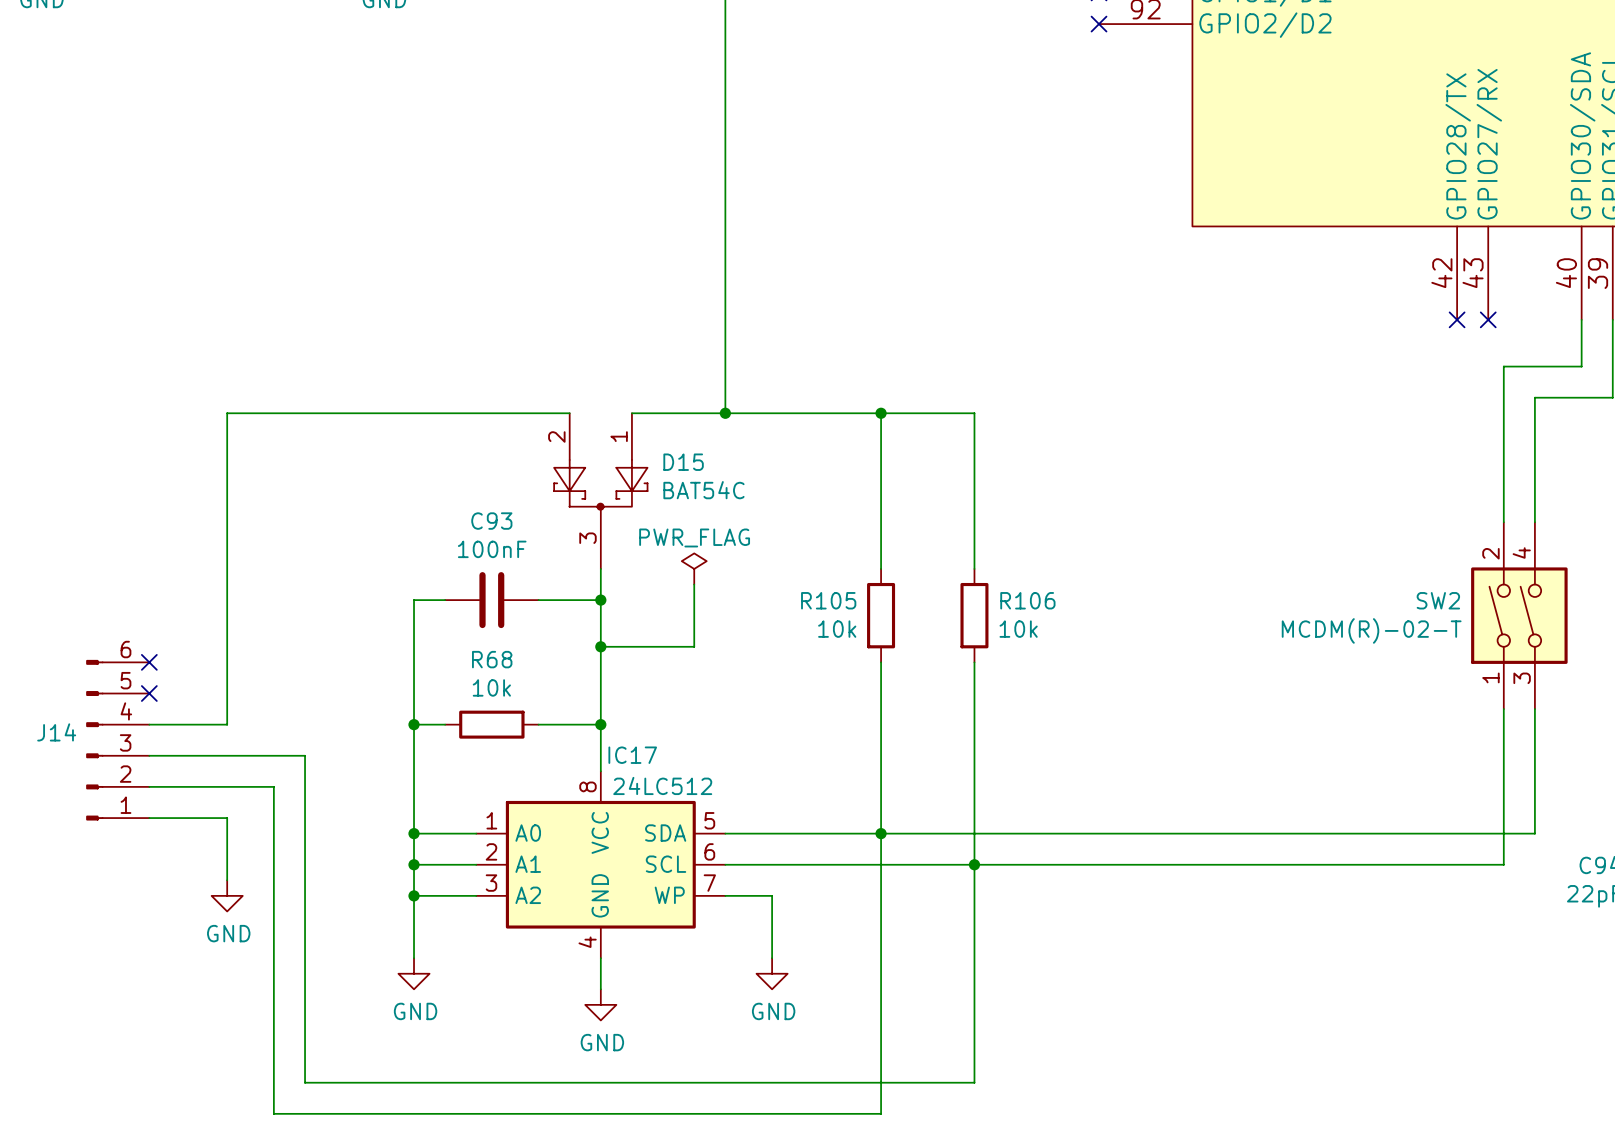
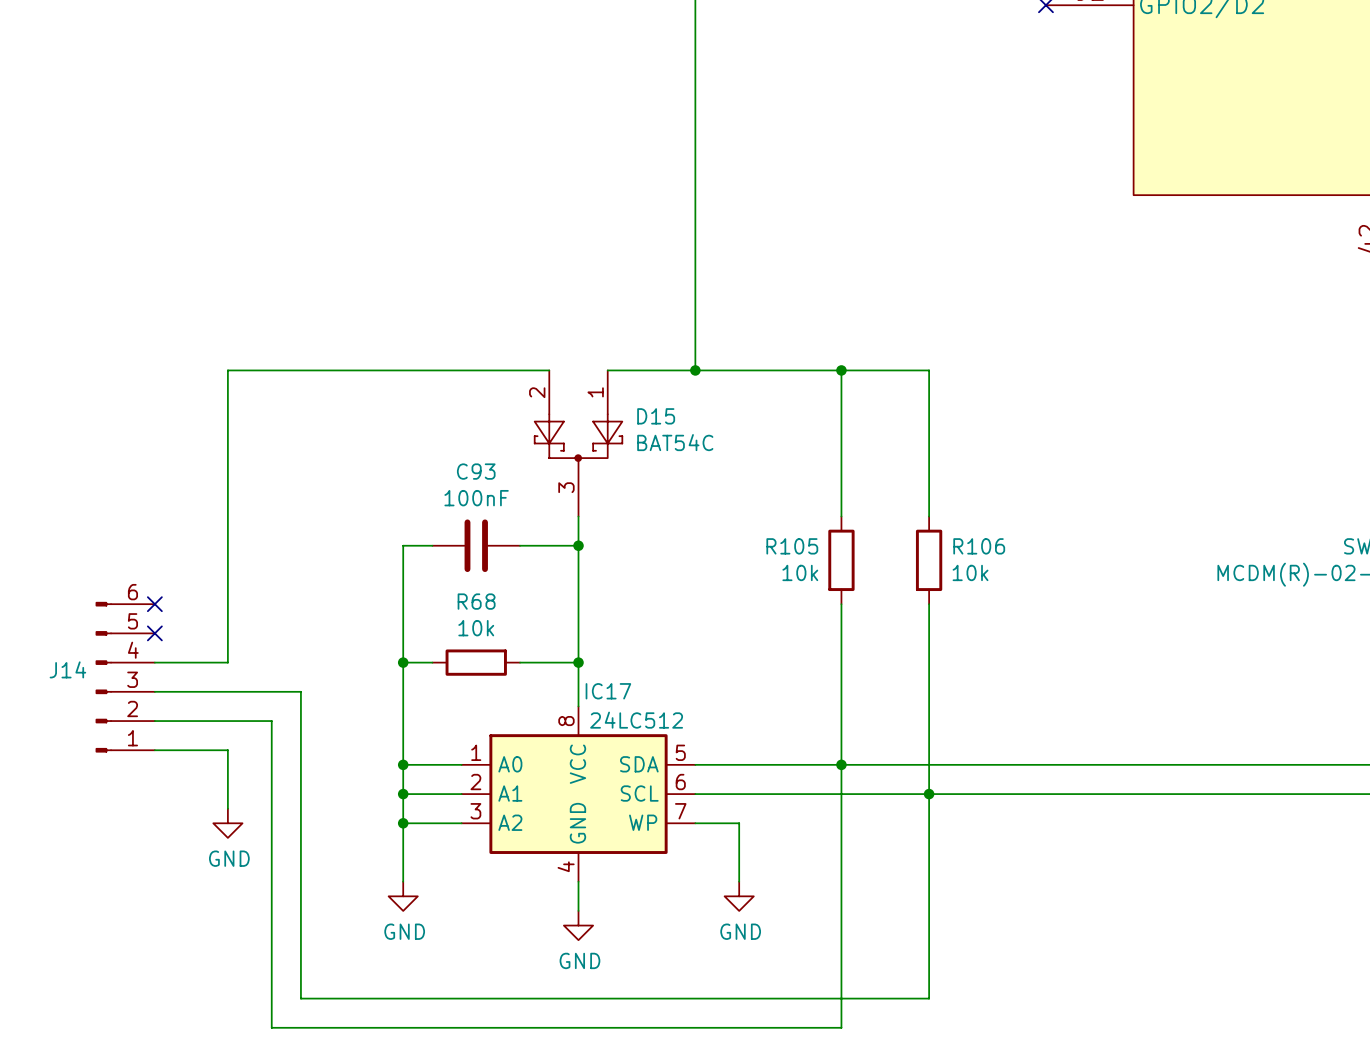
power symbol: PWR_FLAG (694, 568) -> none
wire: (694, 584) (694, 646) (600, 646) -> none
junction: (600, 646) -> none

